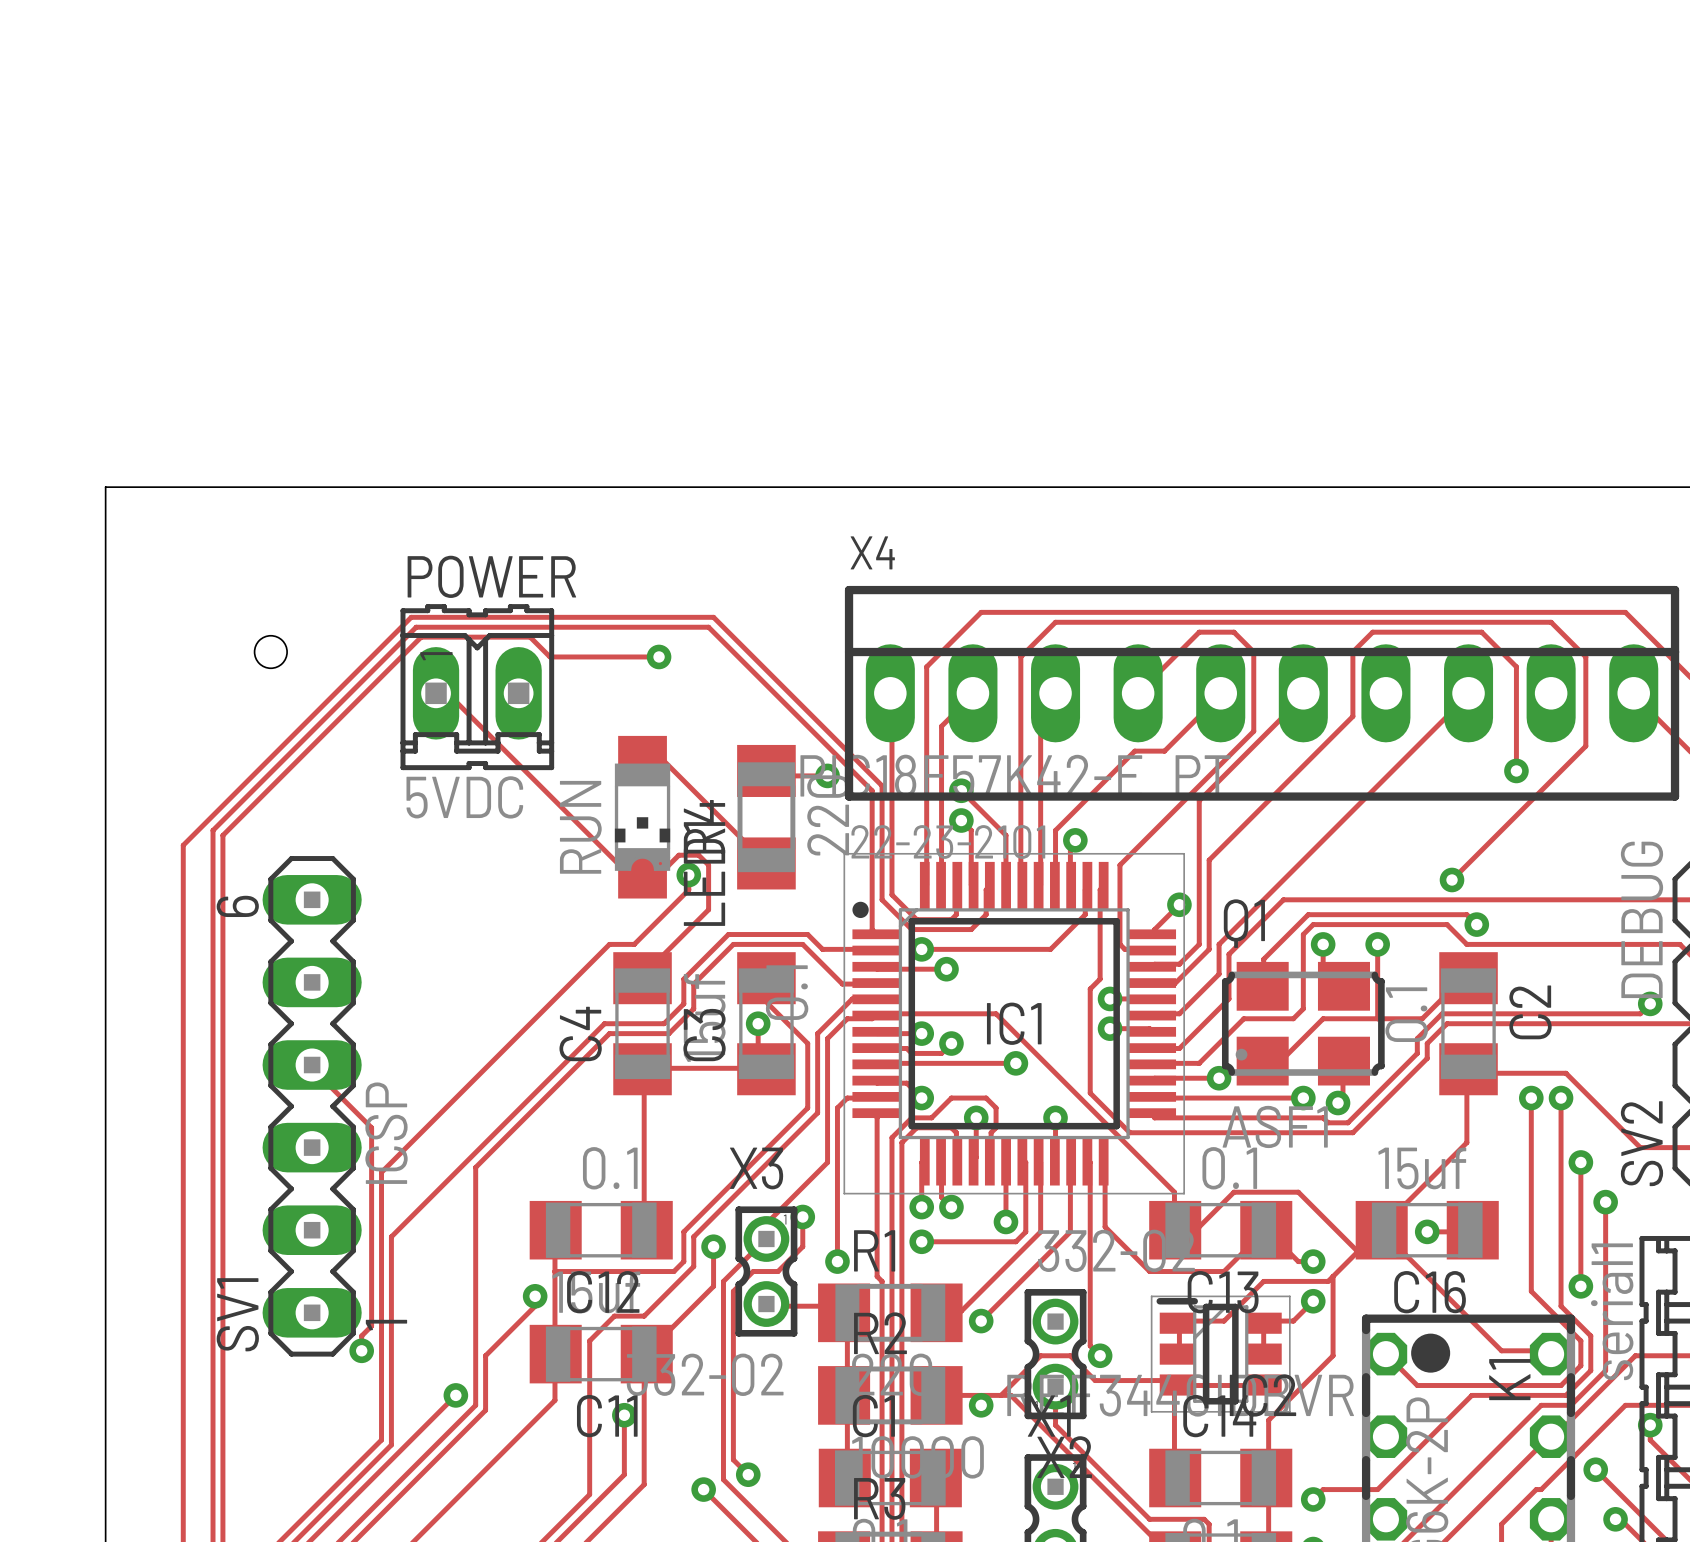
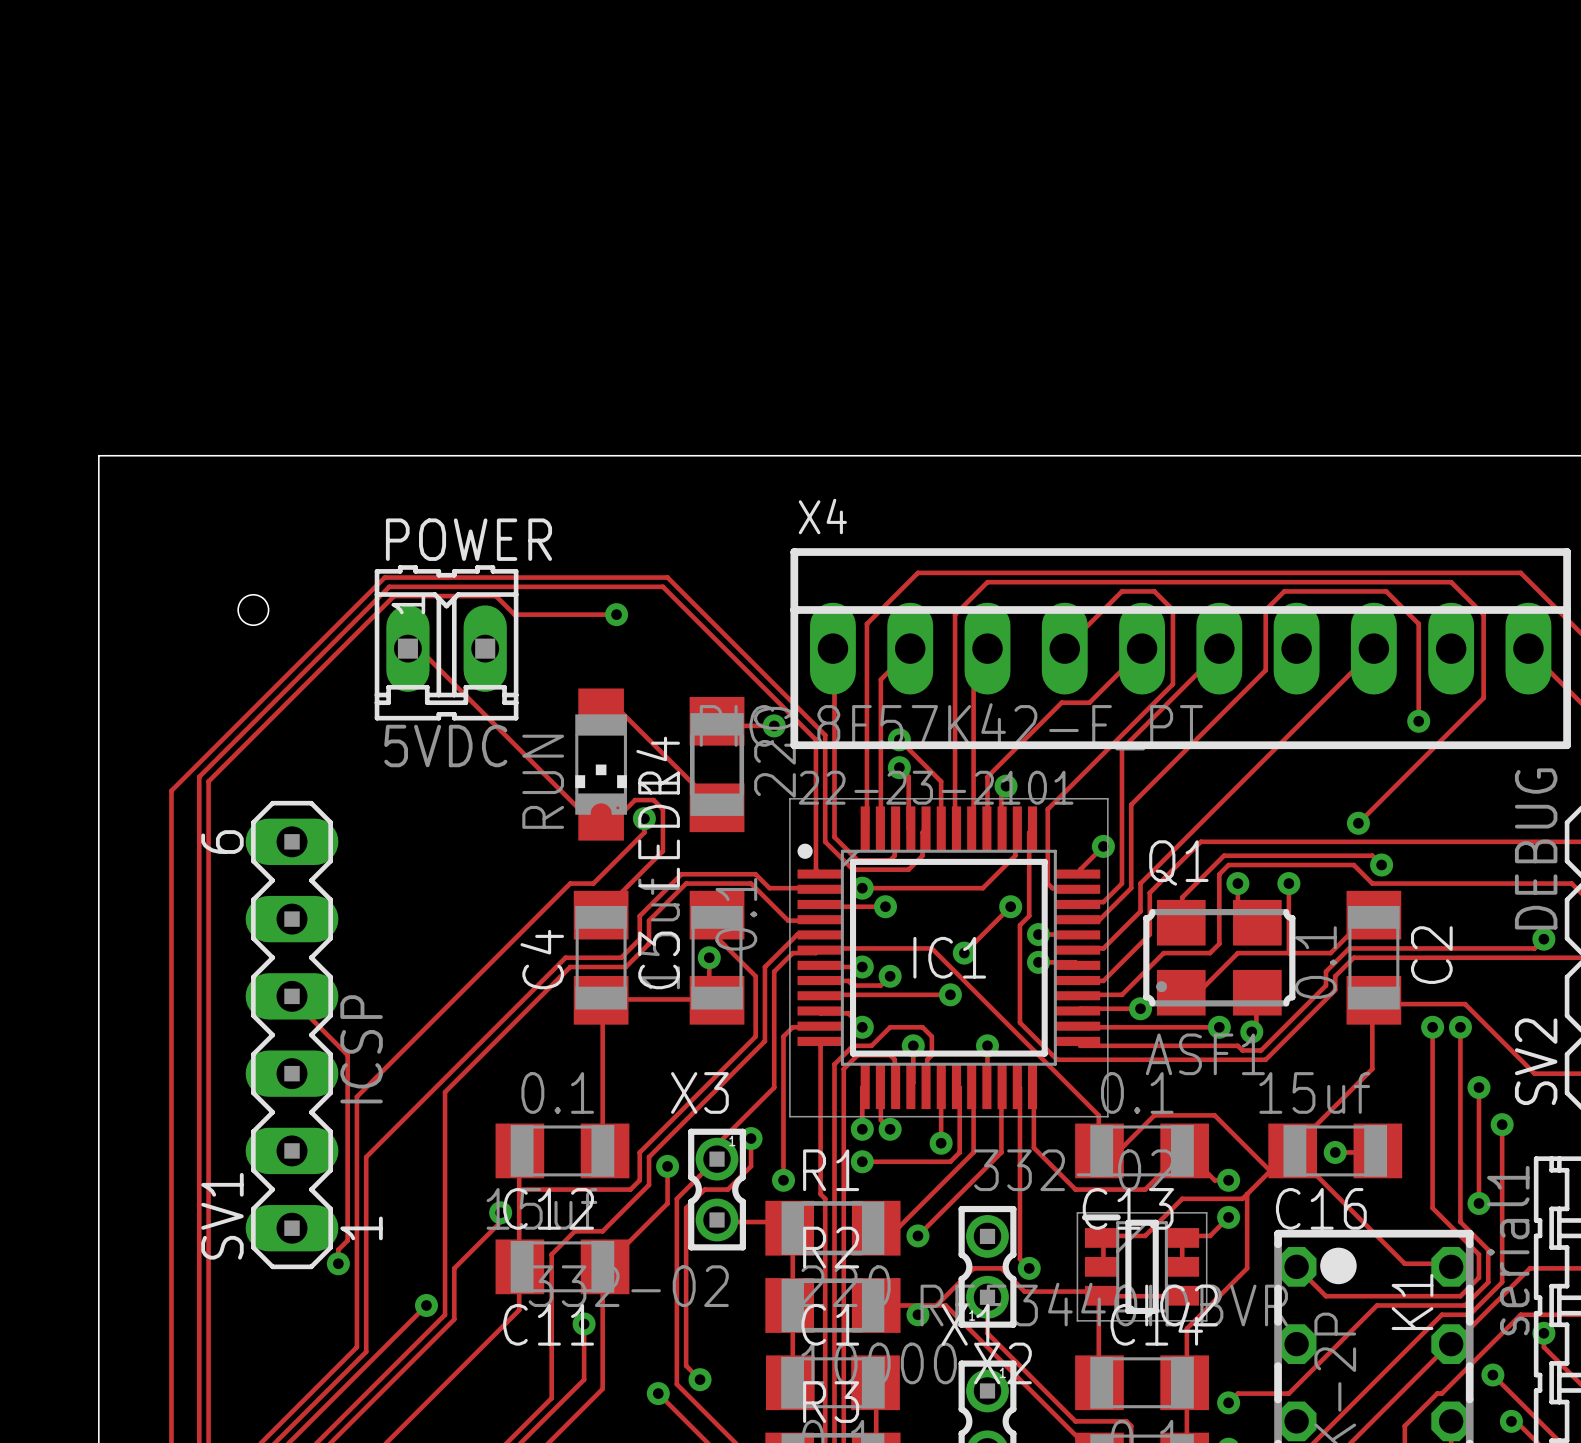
track: none -> (1010, 906) (964, 953)
via: none -> (1010, 906)
via: none -> (964, 953)

